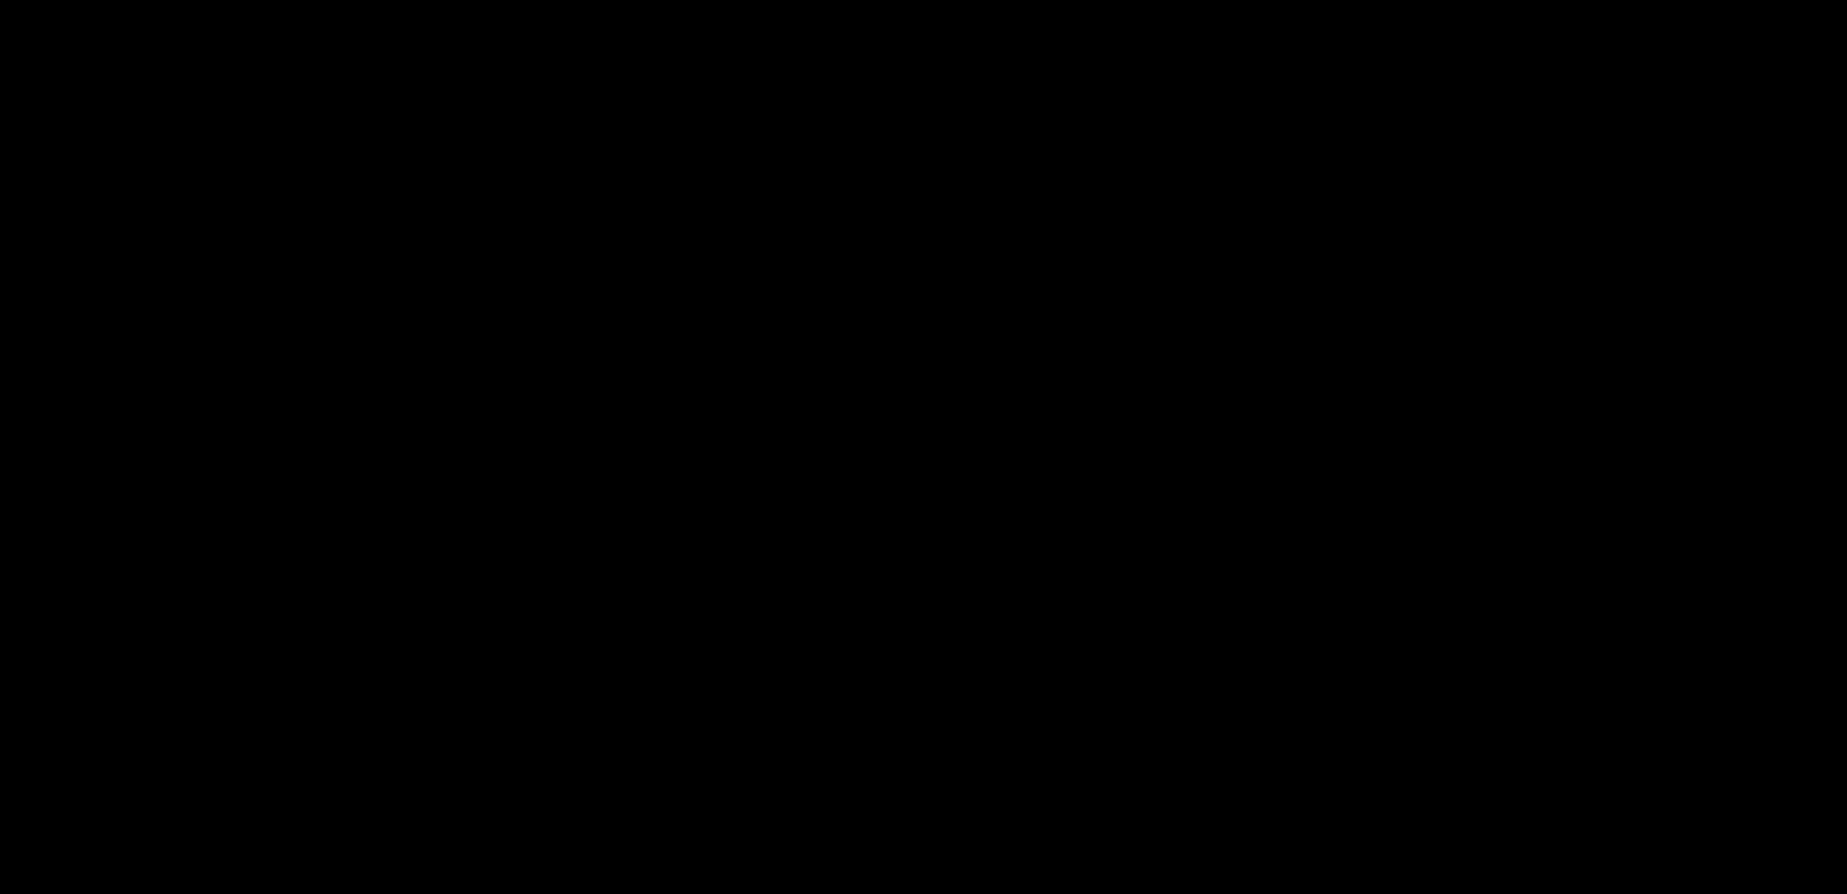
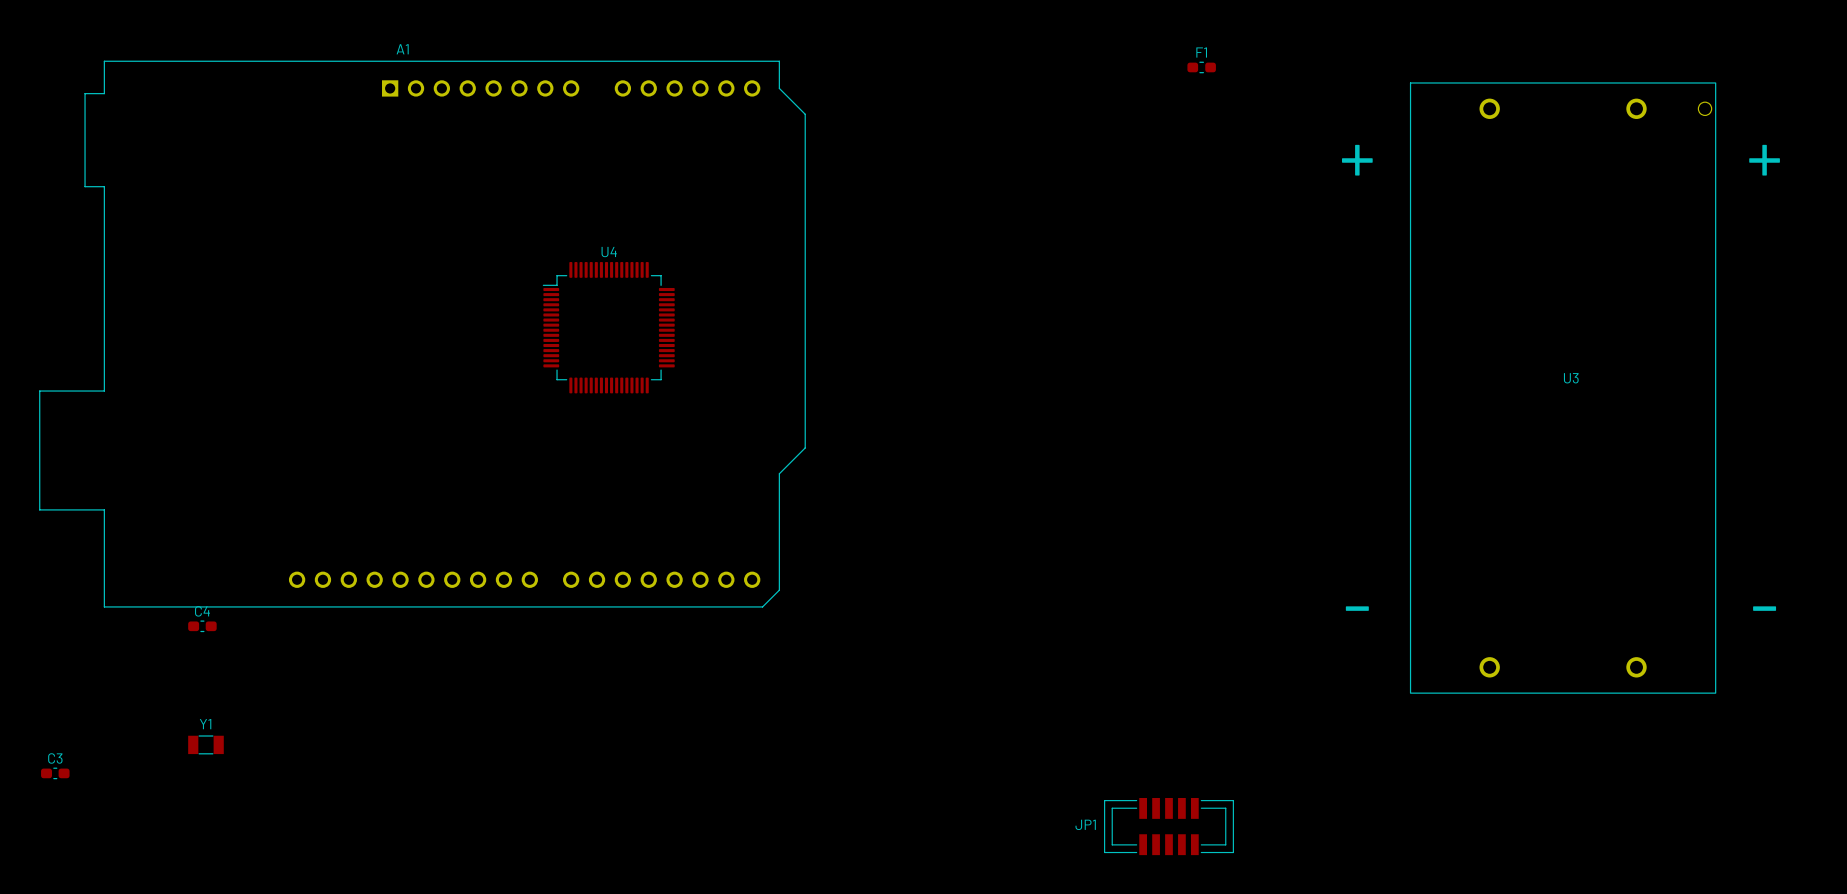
F1: none -> (1201, 67)
U4: none -> (608, 327)
A1: none -> (422, 334)
U3: none -> (1563, 388)
C4: none -> (202, 626)
Y1: none -> (205, 744)
C3: none -> (55, 773)
JP1: none -> (1168, 826)

